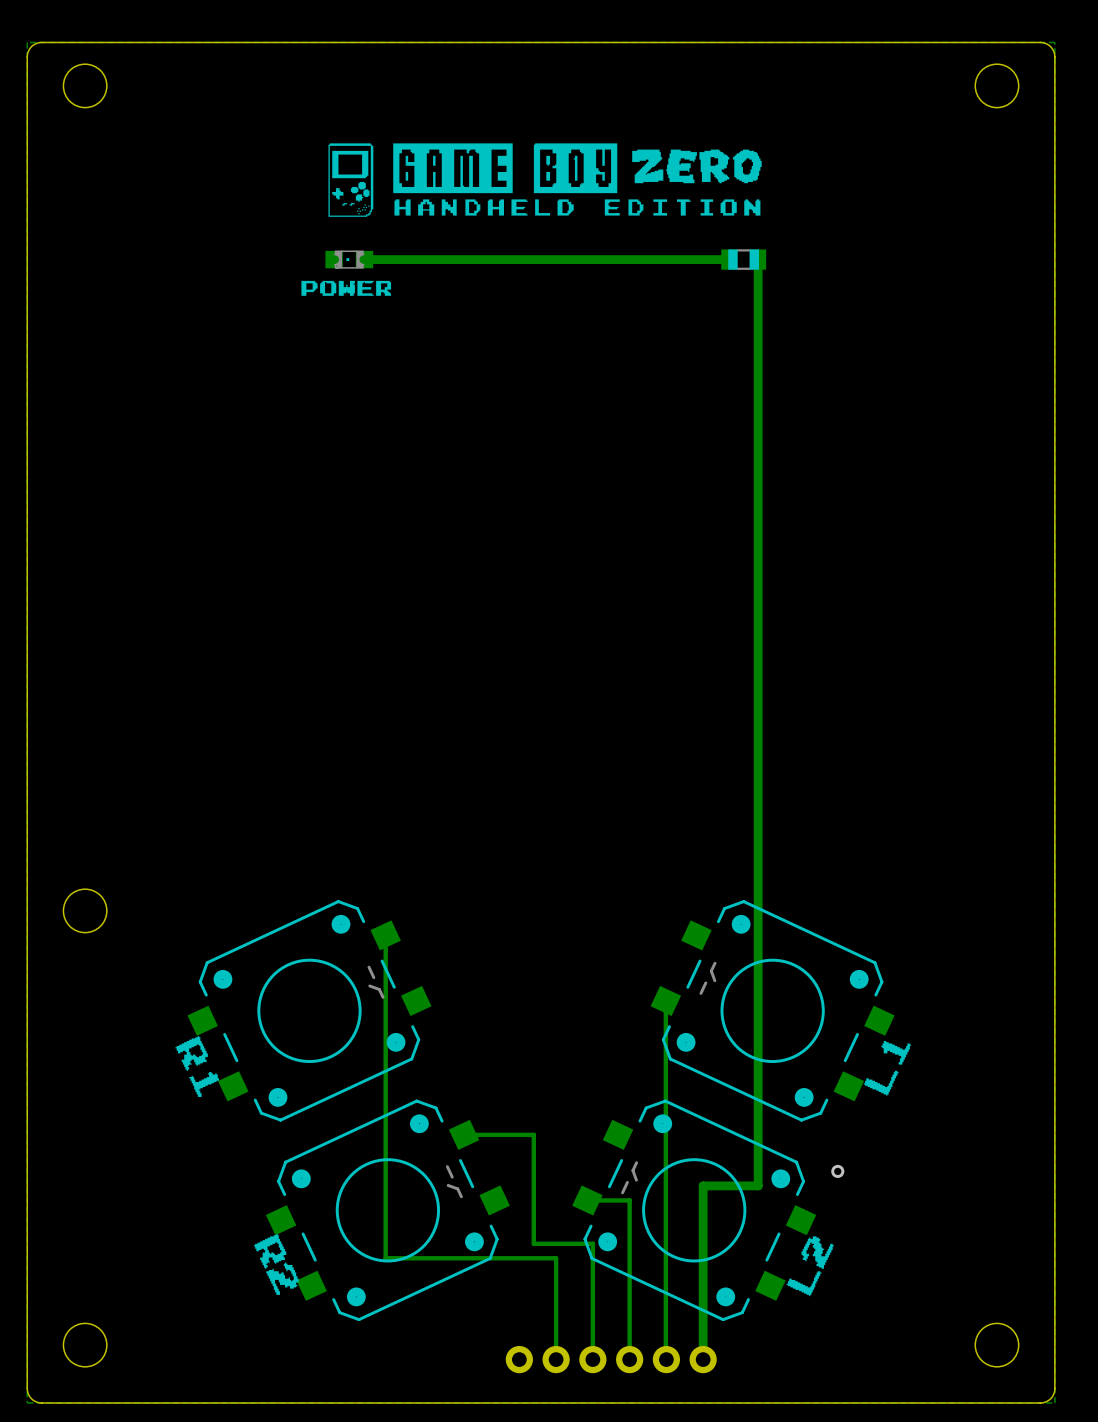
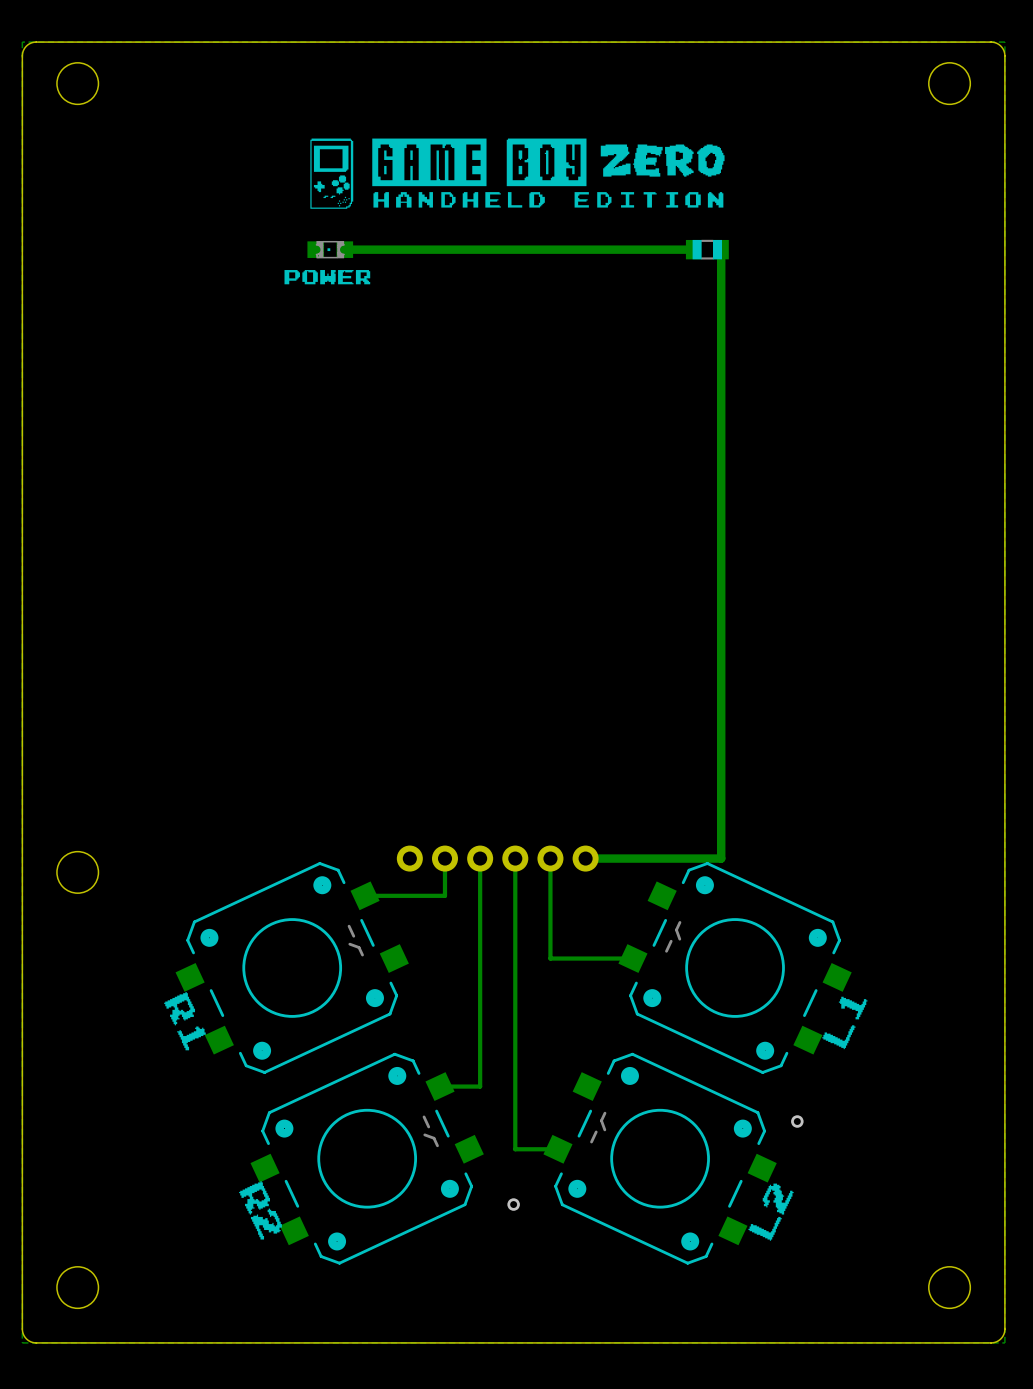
part: none -> (497, 858)
track: (758, 896) (758, 1185) (703, 1185) (703, 1359) -> (721, 858) (585, 858)
track: (385, 935) (385, 1258) (556, 1258) (556, 1359) -> (365, 895) (444, 895) (444, 858)
track: (665, 1000) (666, 1359) -> (632, 958) (550, 958) (550, 858)
track: (506, 1134) (533, 1134) (533, 1243) (592, 1243) (592, 1359) -> (480, 1086) (480, 858)
track: (587, 1200) (629, 1200) (629, 1359) -> (557, 1149) (515, 1149) (515, 858)
via: none -> (513, 1204)
part: (611, 1359) -> none

